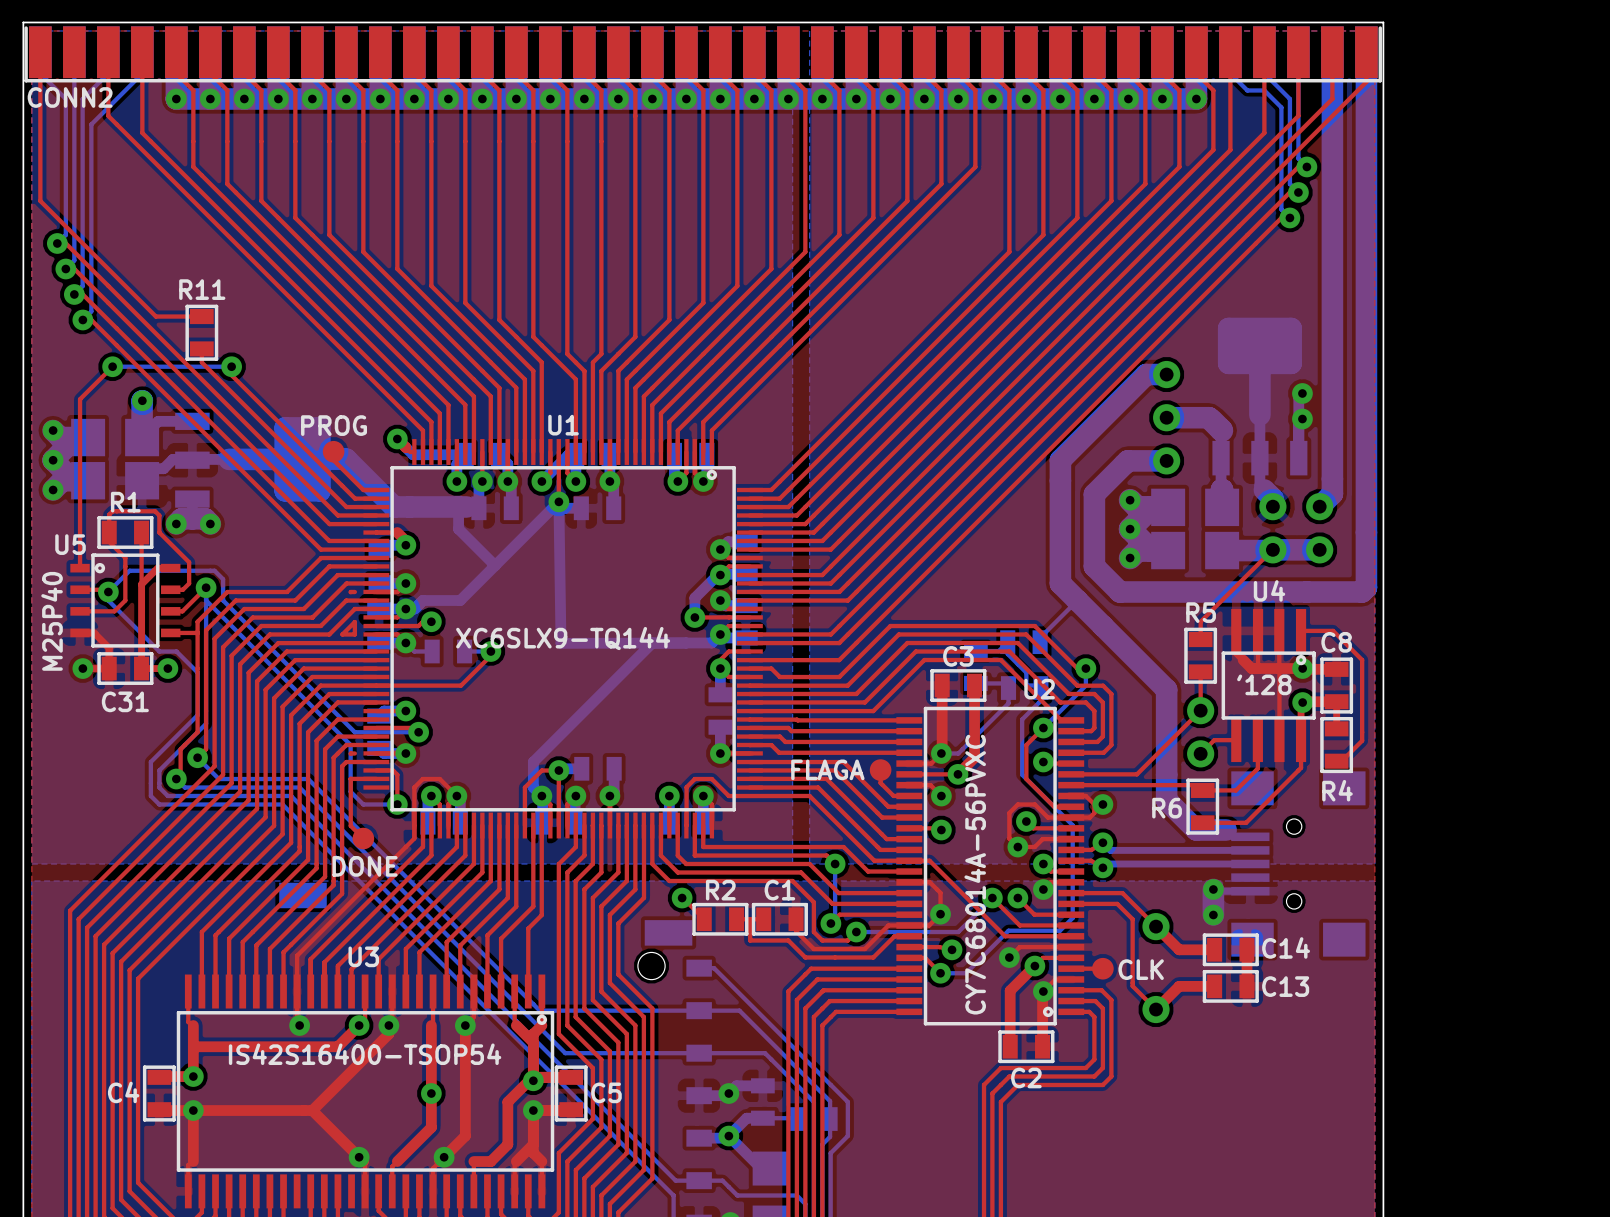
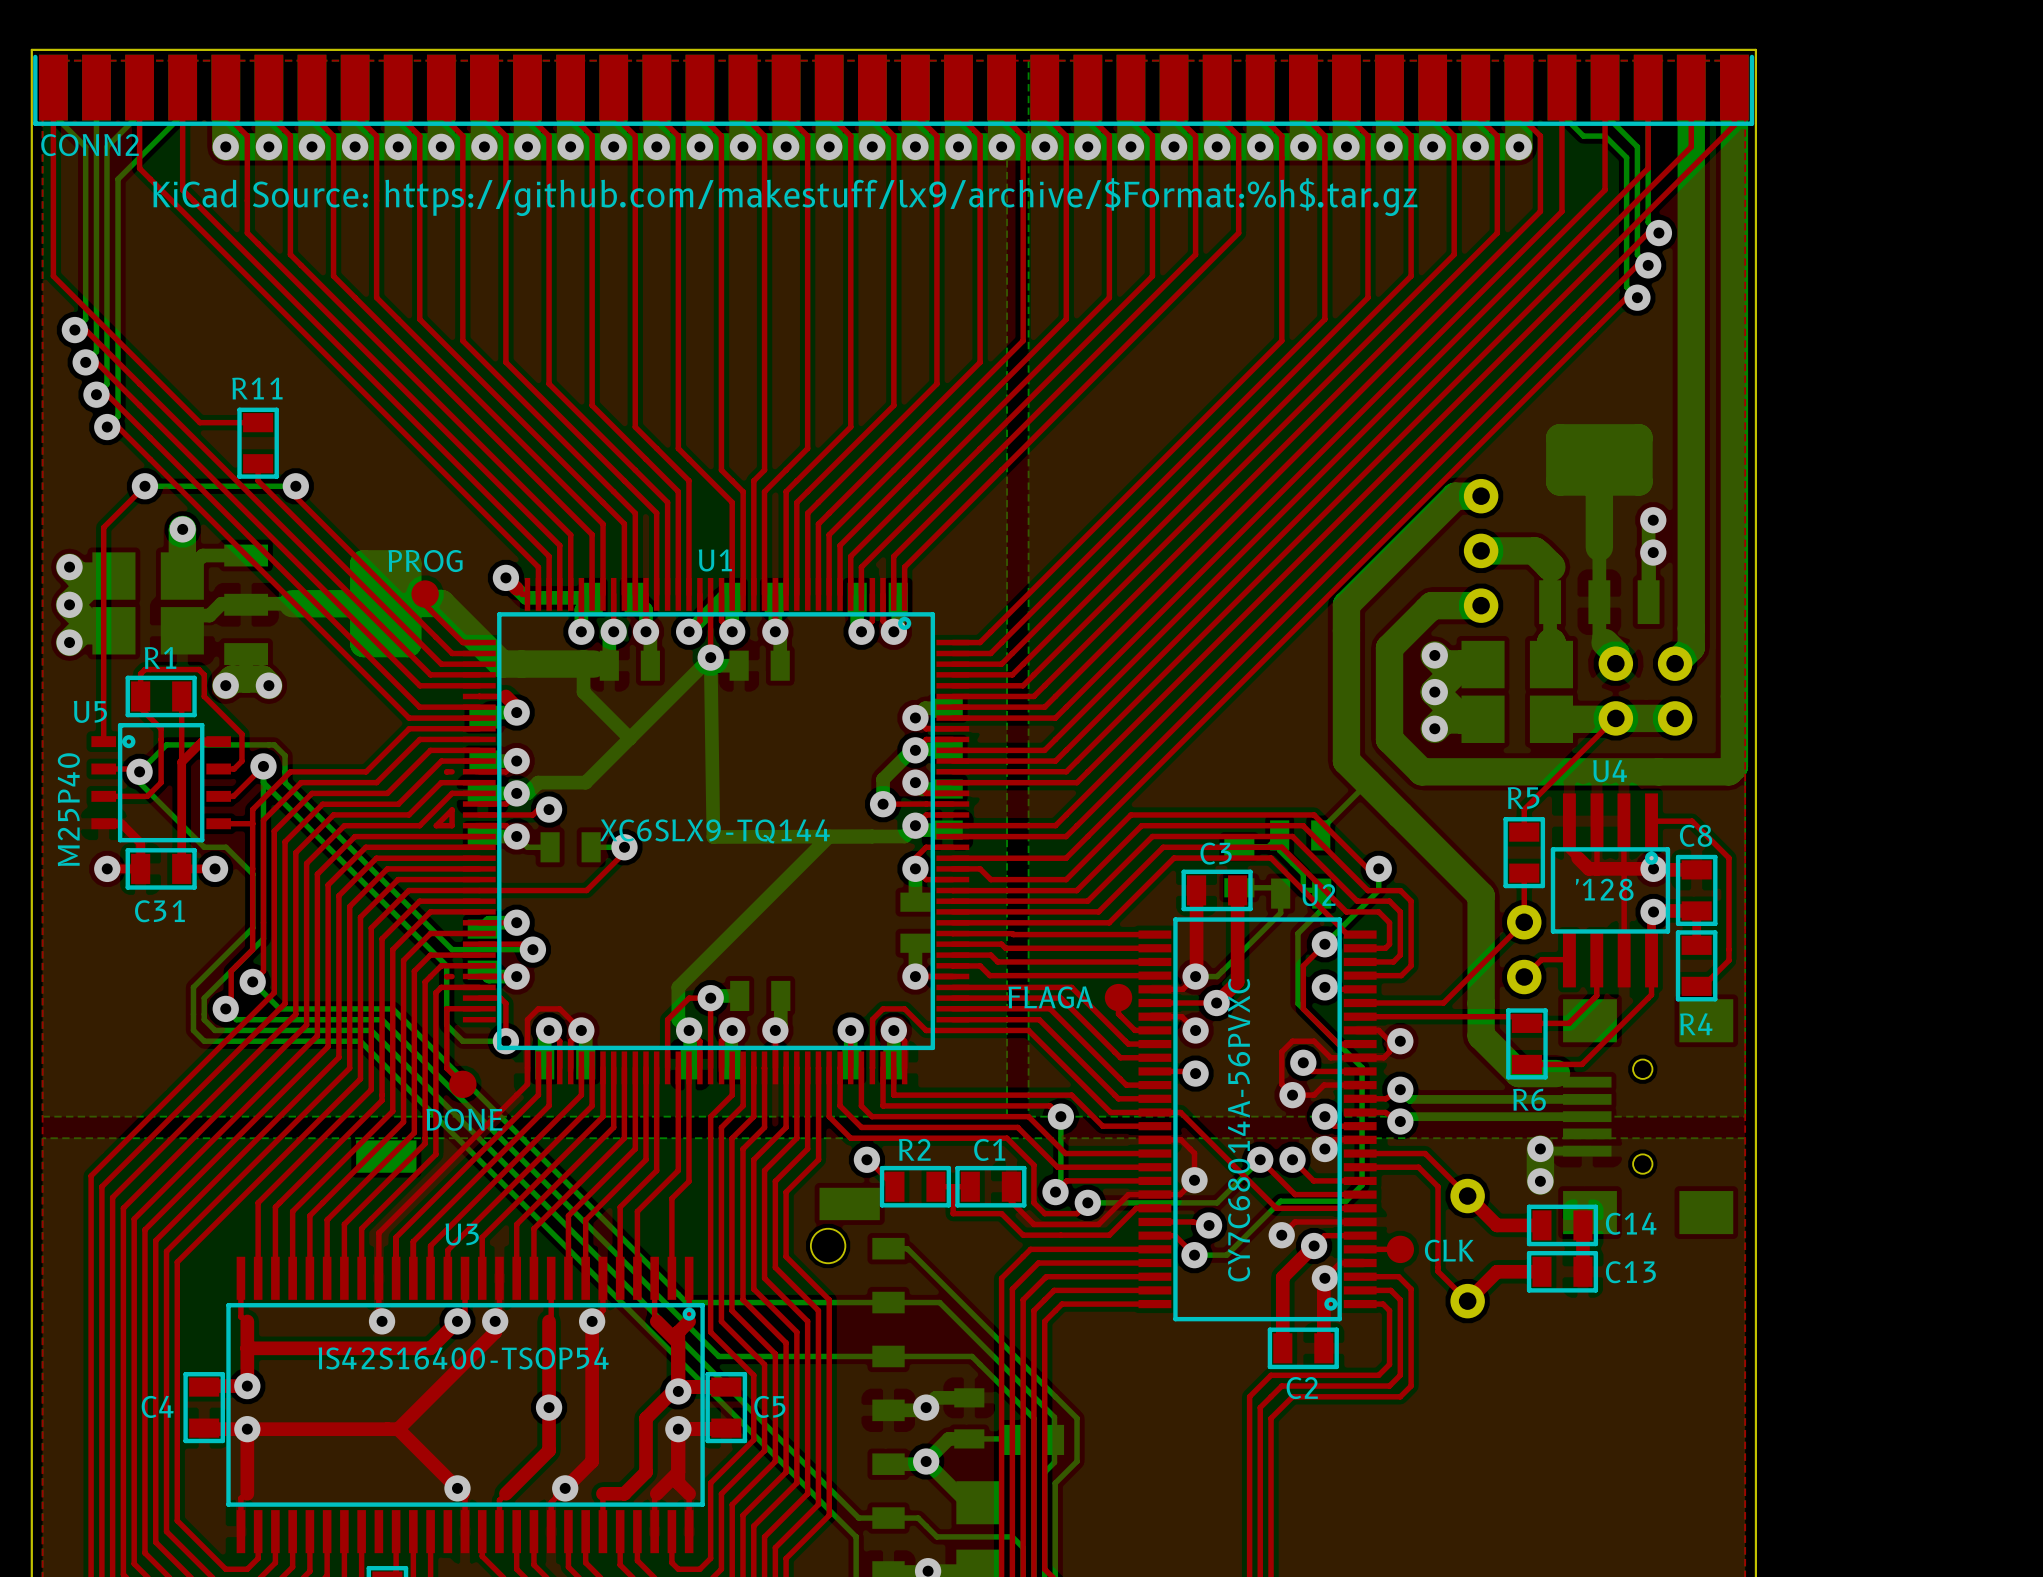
text: none -> KiCad Source: https://github.com/makestuff/lx9/archive/$Format:%h$.tar.gz (785, 197)
R6 name position: R6 (1167, 808) -> R6 (1529, 1099)

